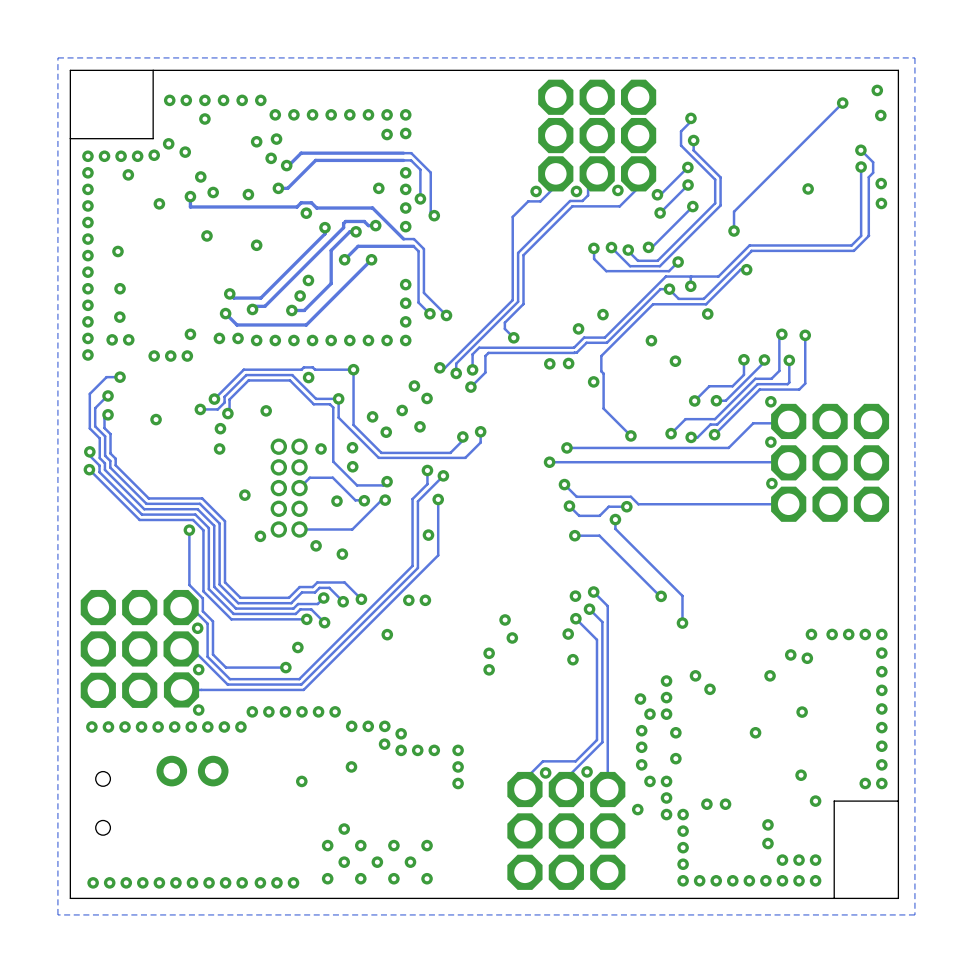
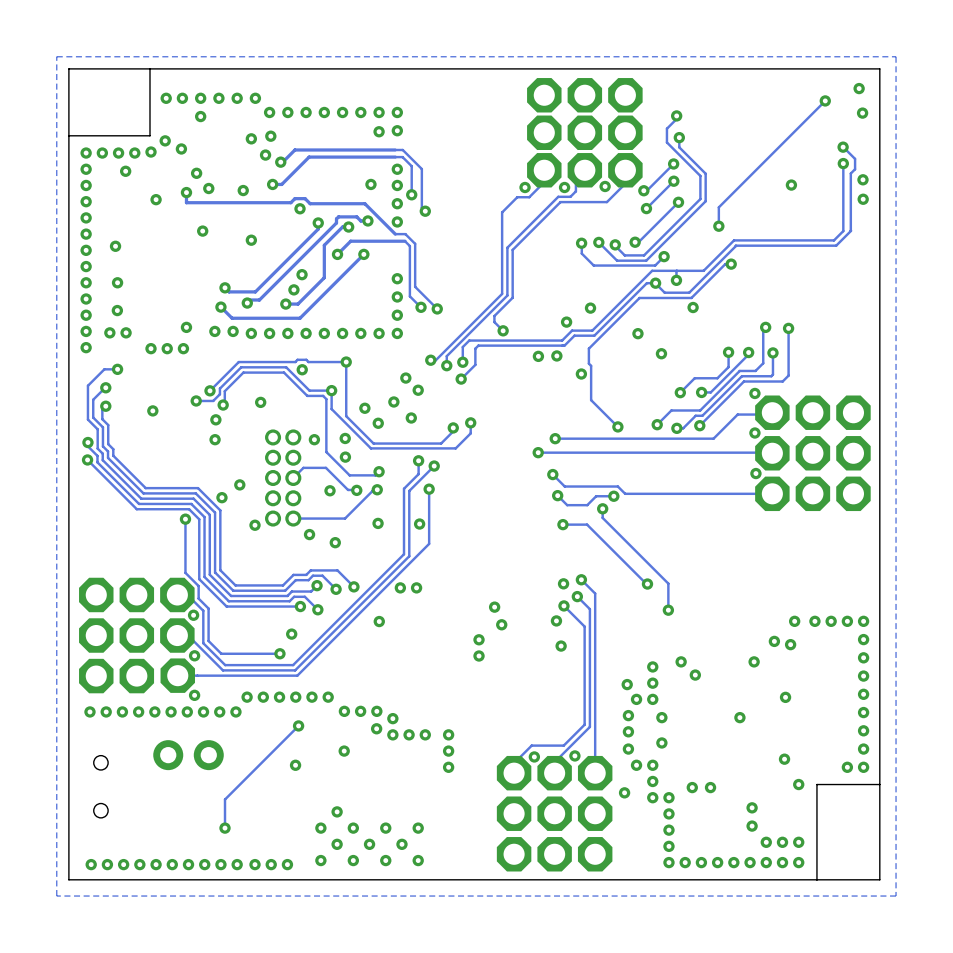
via: none -> (221, 497)
via: none -> (378, 523)
track: none -> (298, 725) (225, 799) (225, 828)
via: none -> (298, 725)
via: none -> (225, 828)

